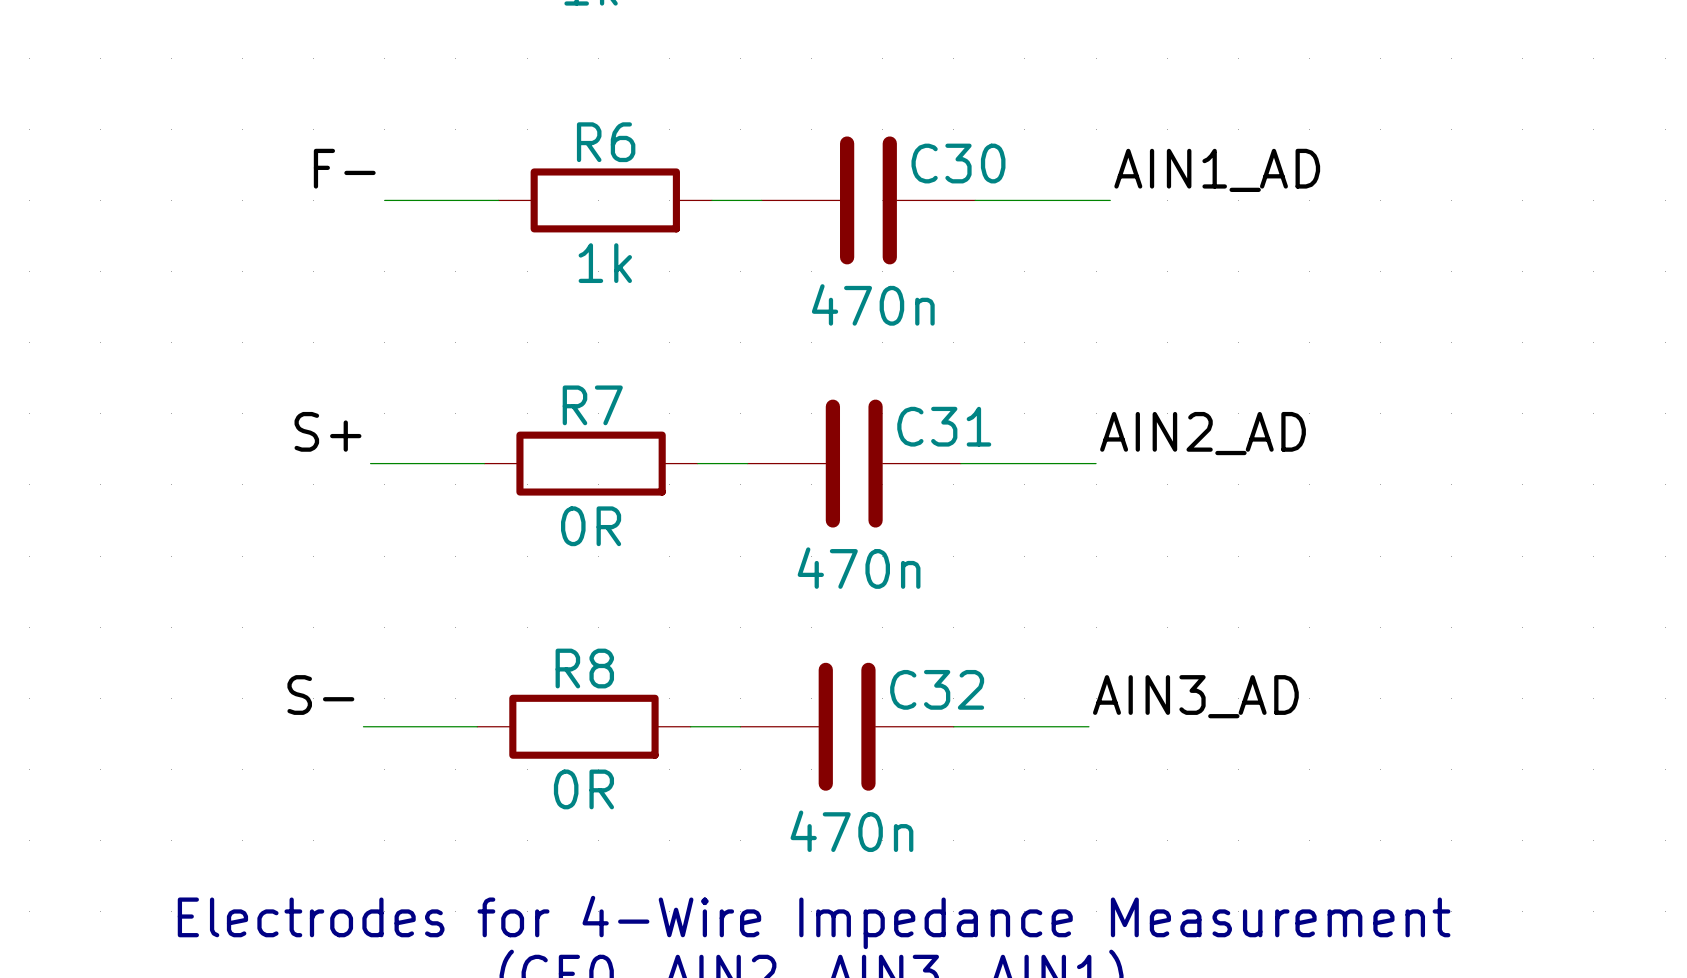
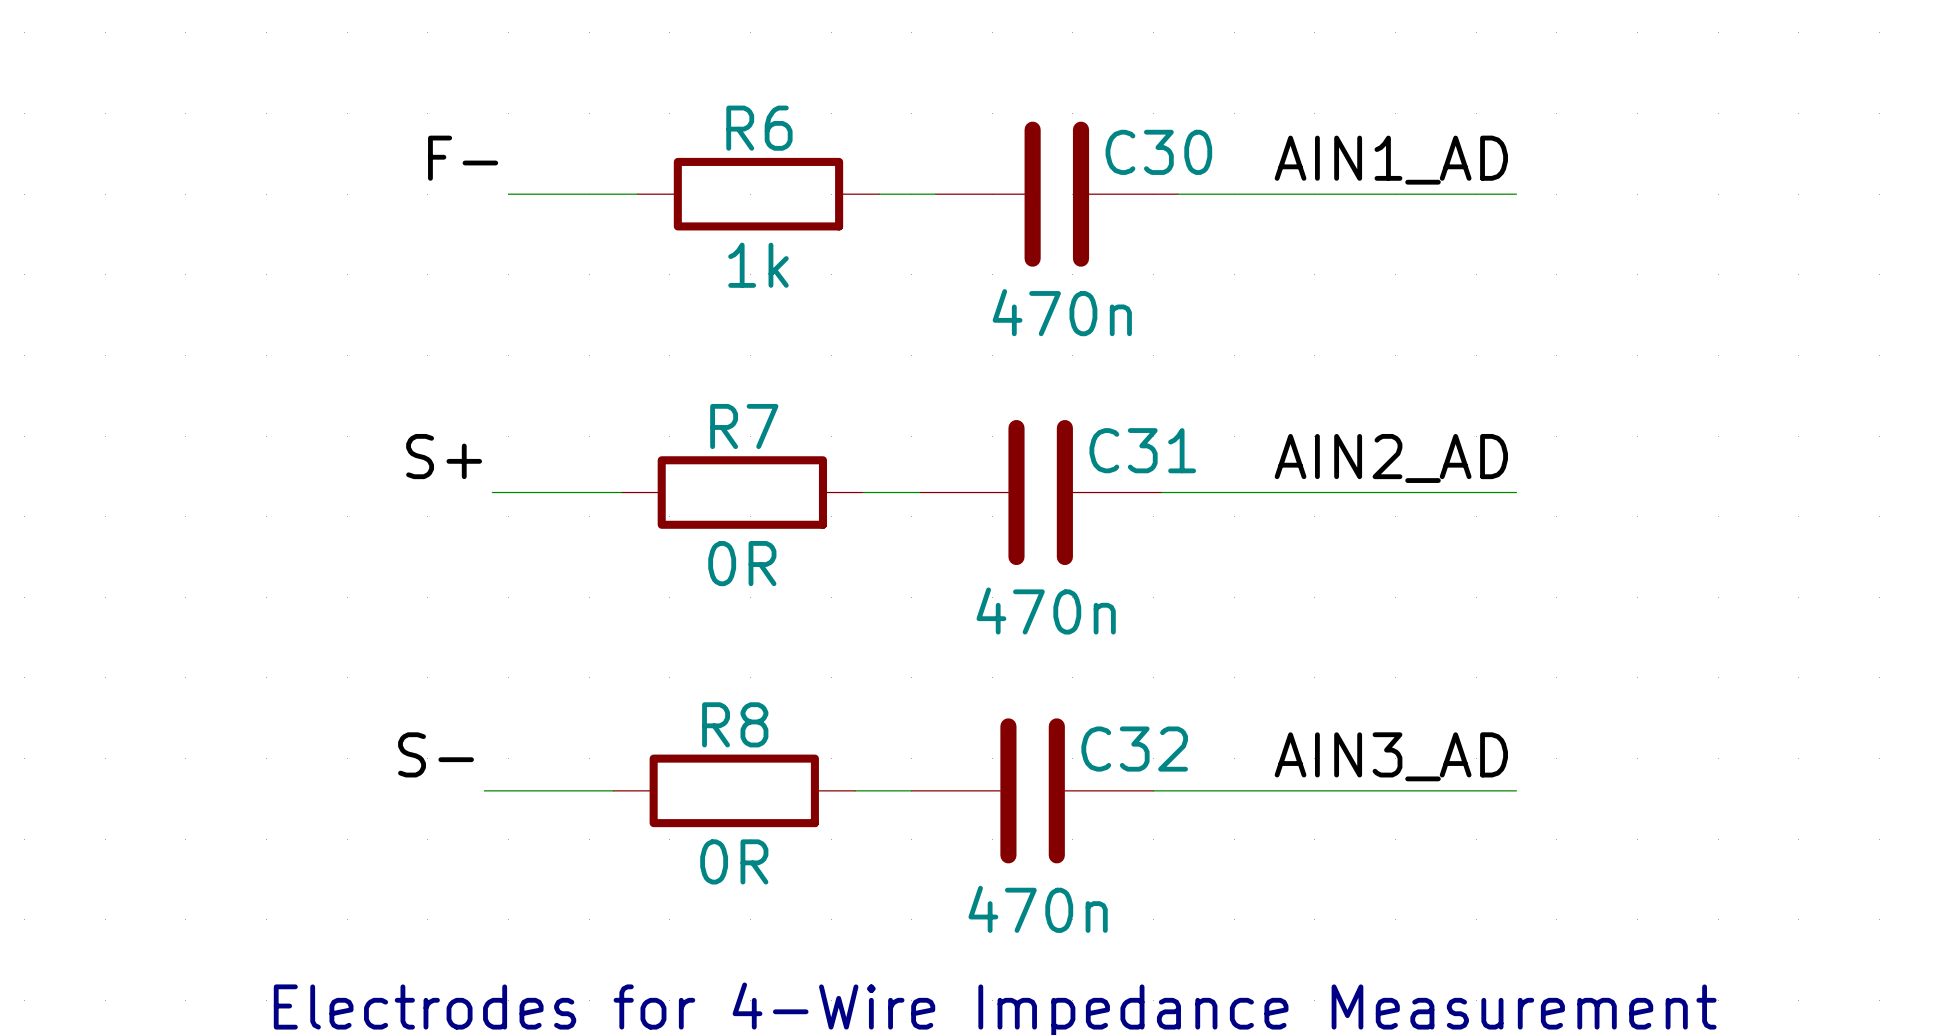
label position: AIN1_AD (1217, 170) -> AIN1_AD (1391, 160)
wire: none -> (1330, 194) (1516, 194)
label position: AIN2_AD (1203, 433) -> AIN2_AD (1391, 458)
wire: none -> (1314, 492) (1516, 492)
label position: AIN3_AD (1195, 696) -> AIN3_AD (1391, 756)
wire: none -> (1306, 790) (1516, 790)

